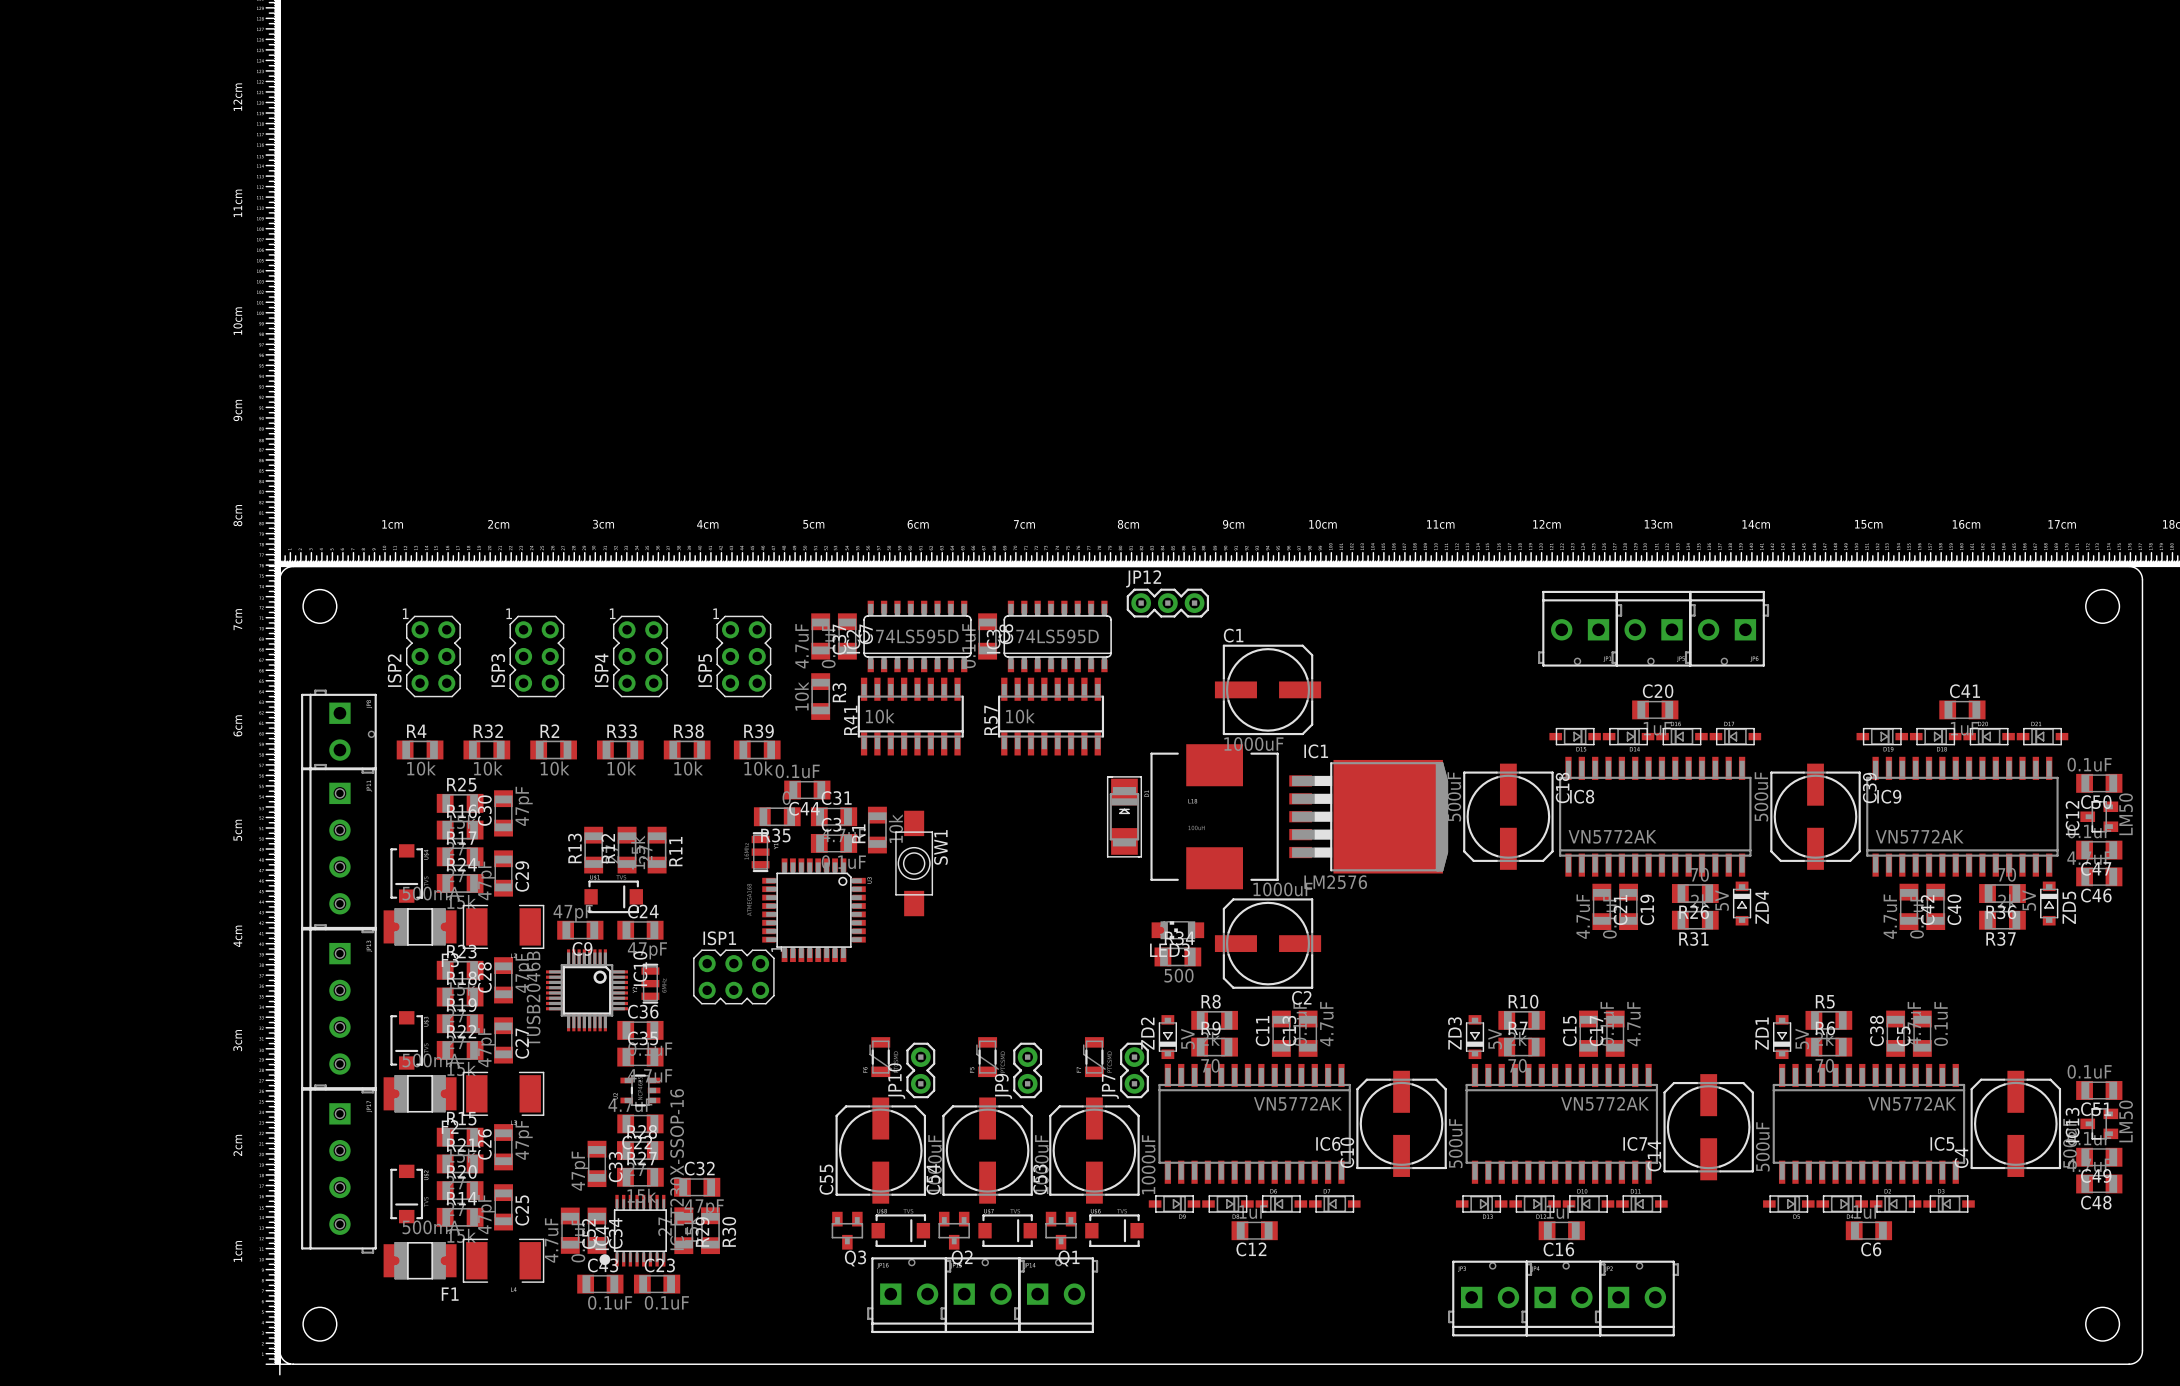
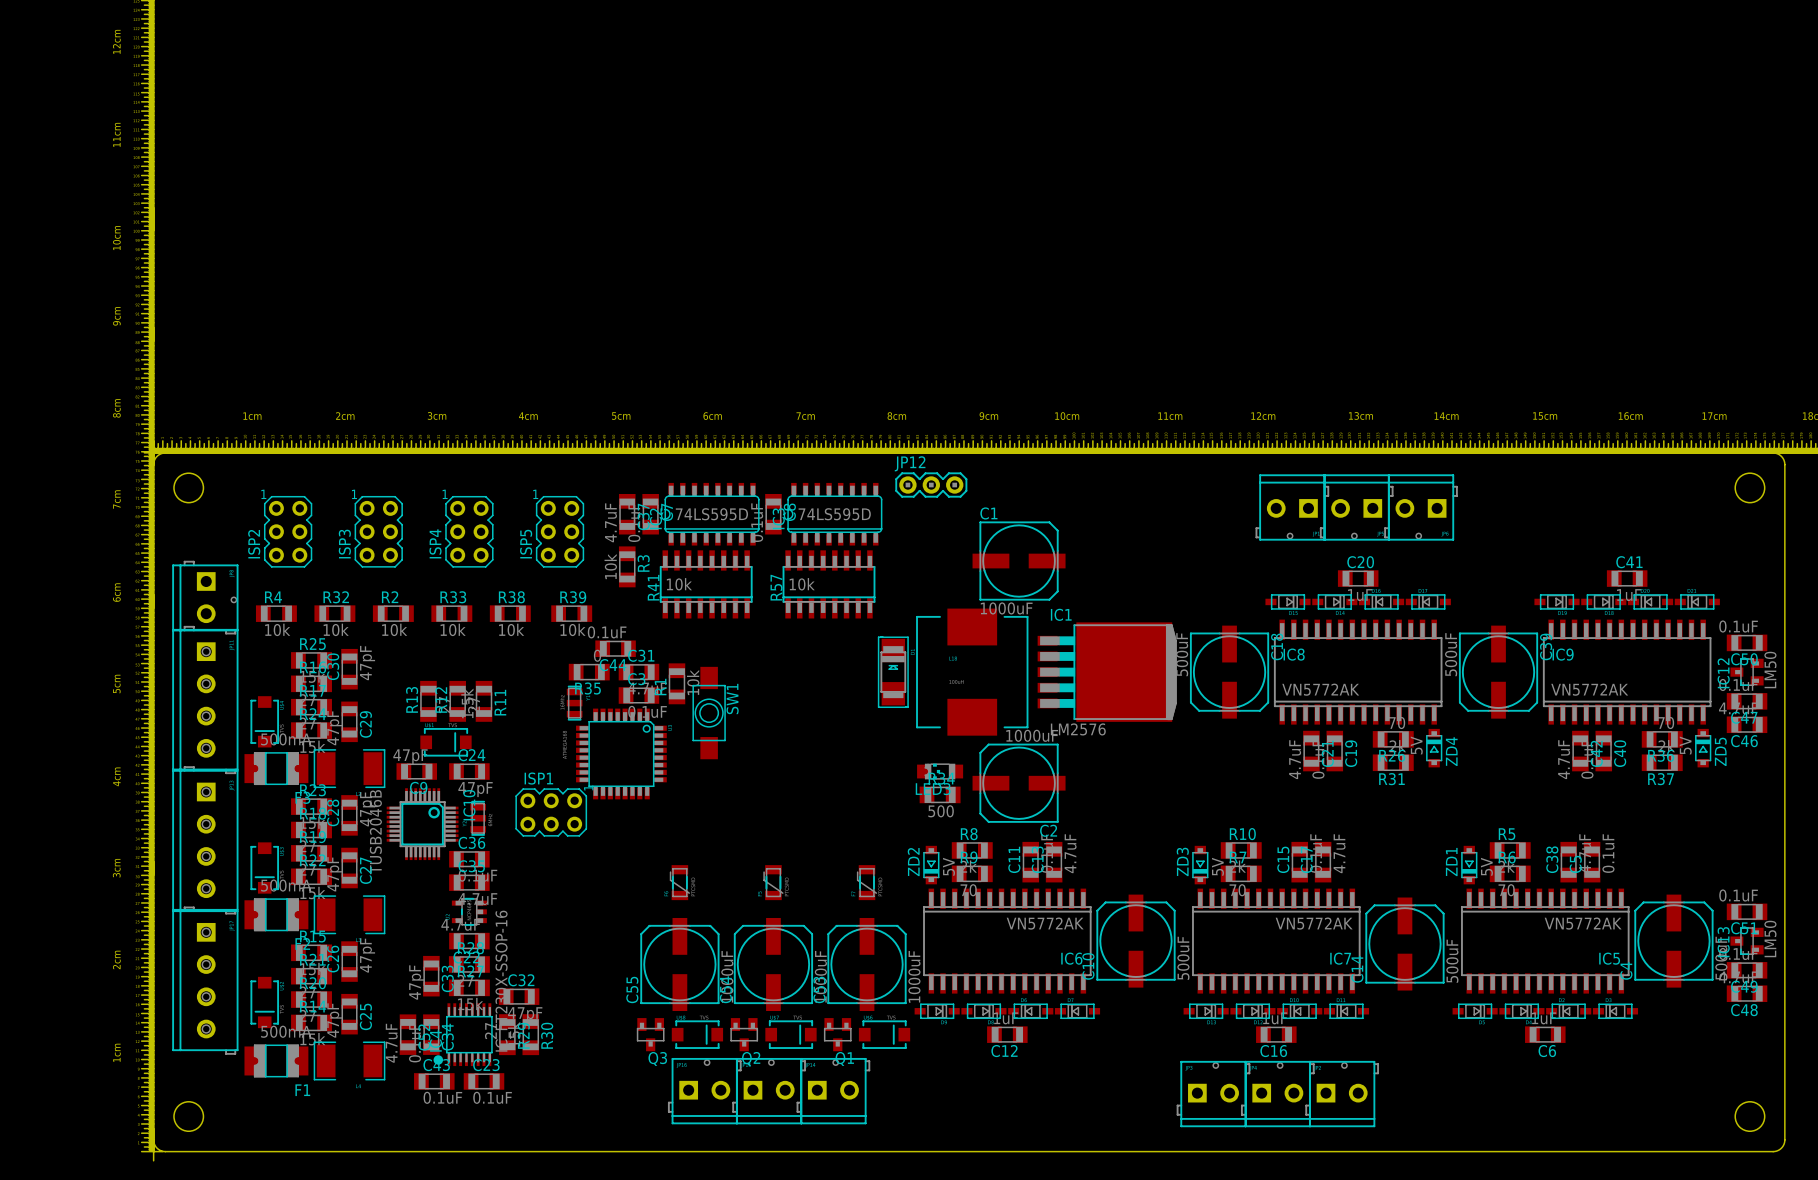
JP10: (920, 1070) -> none
JP9: (1027, 1070) -> none
JP7: (1134, 1070) -> none

